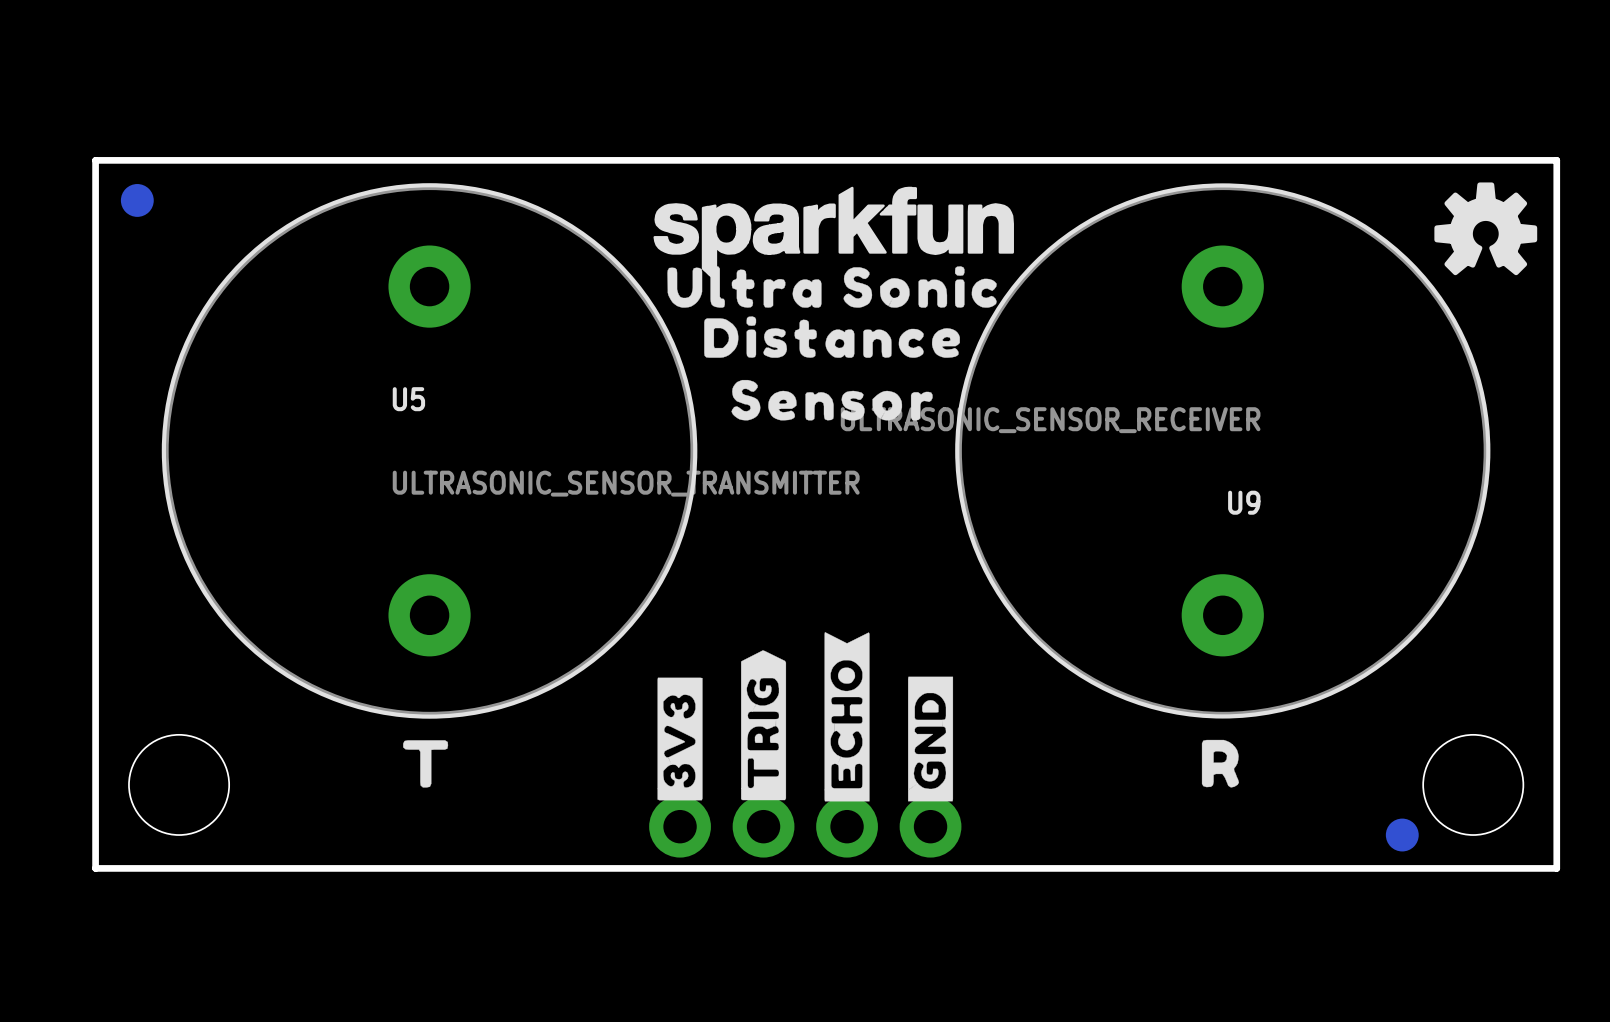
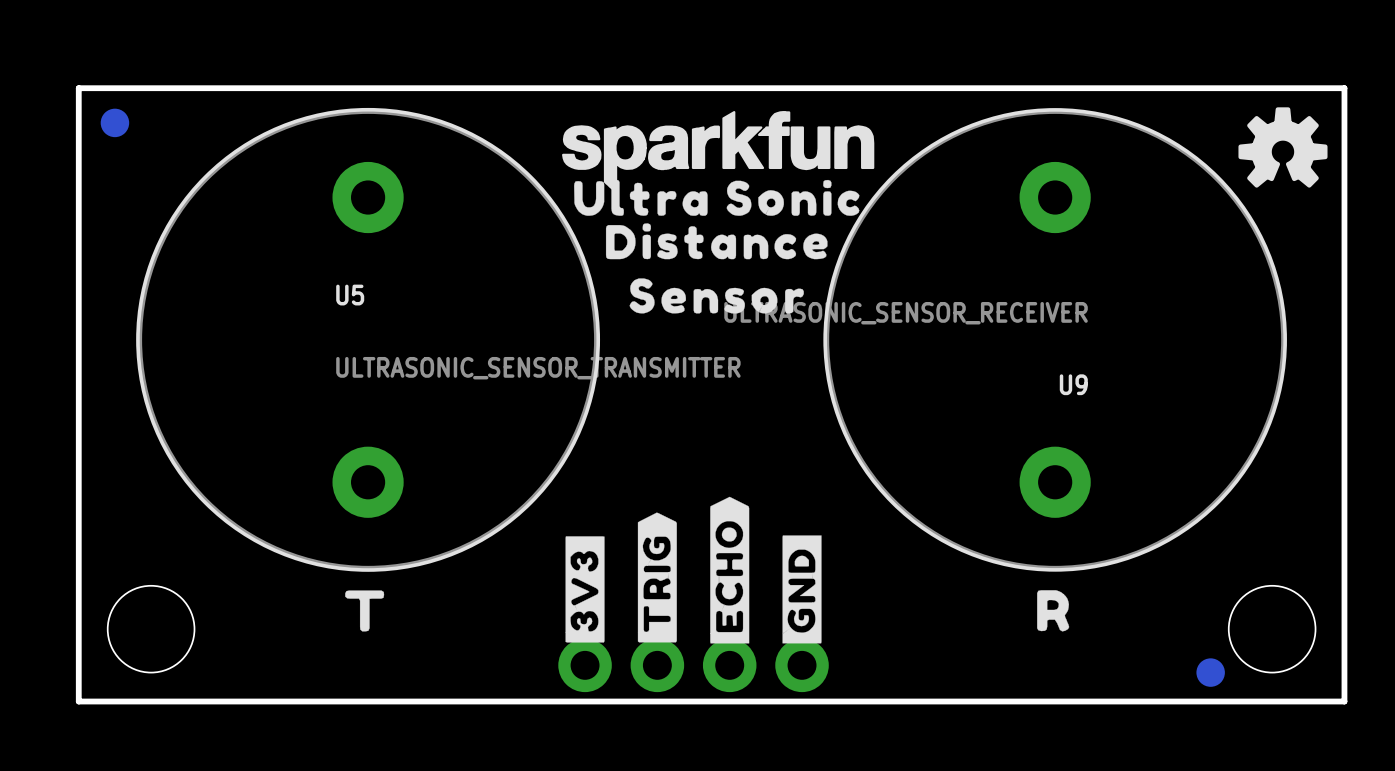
drawing shape: [824, 632, 870, 802] -> [710, 496, 750, 644]

